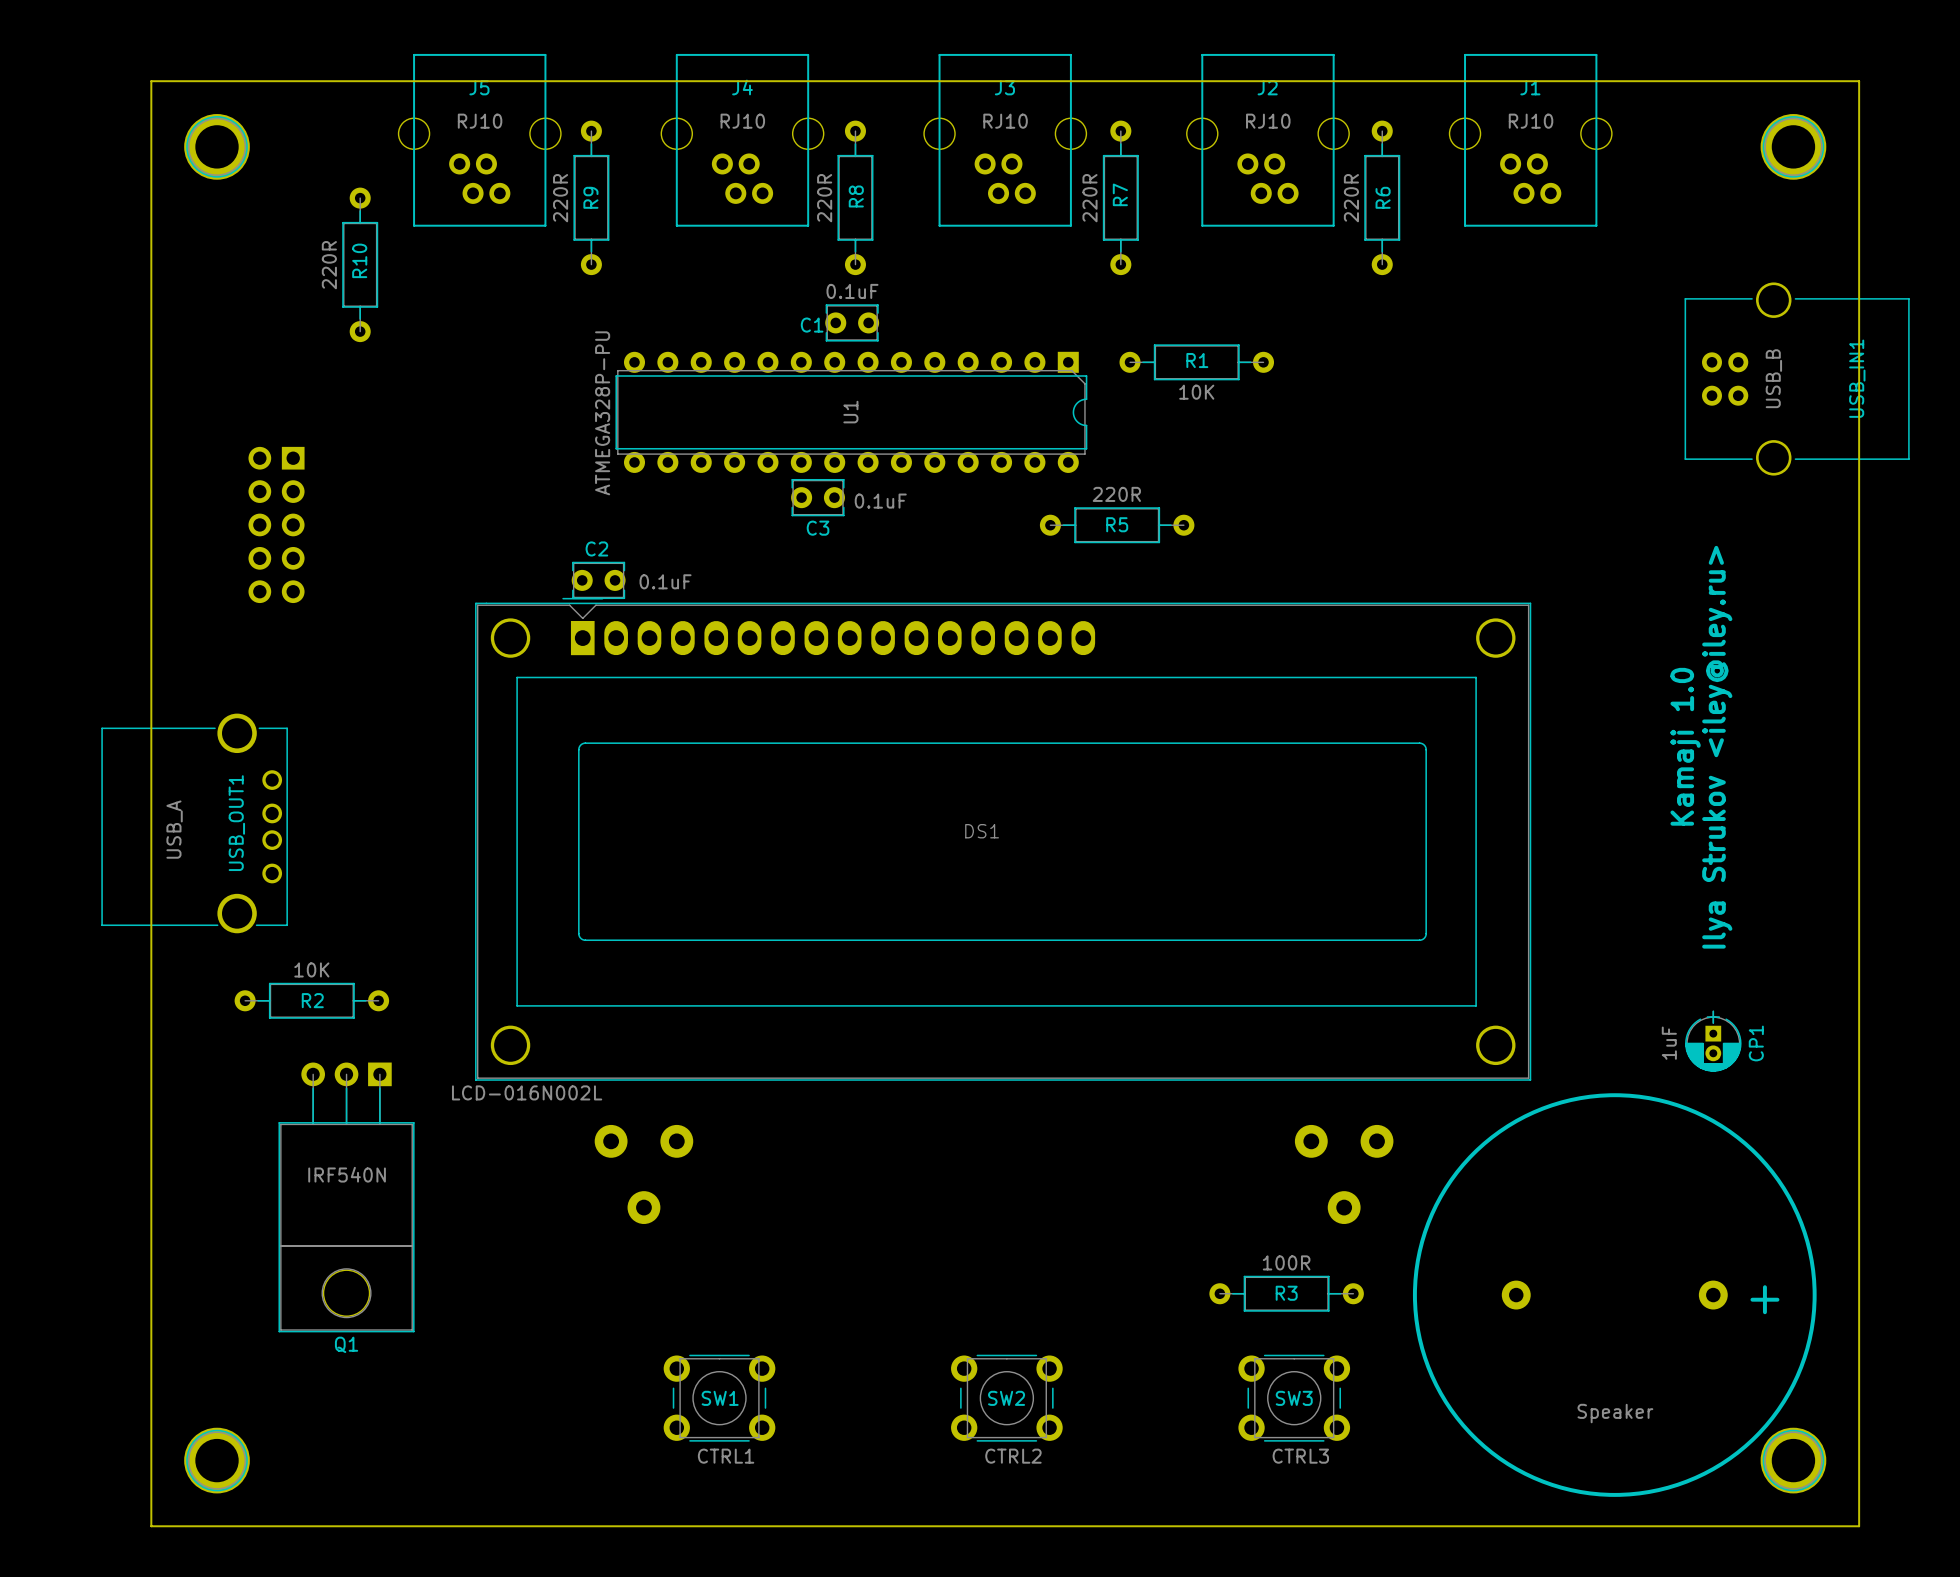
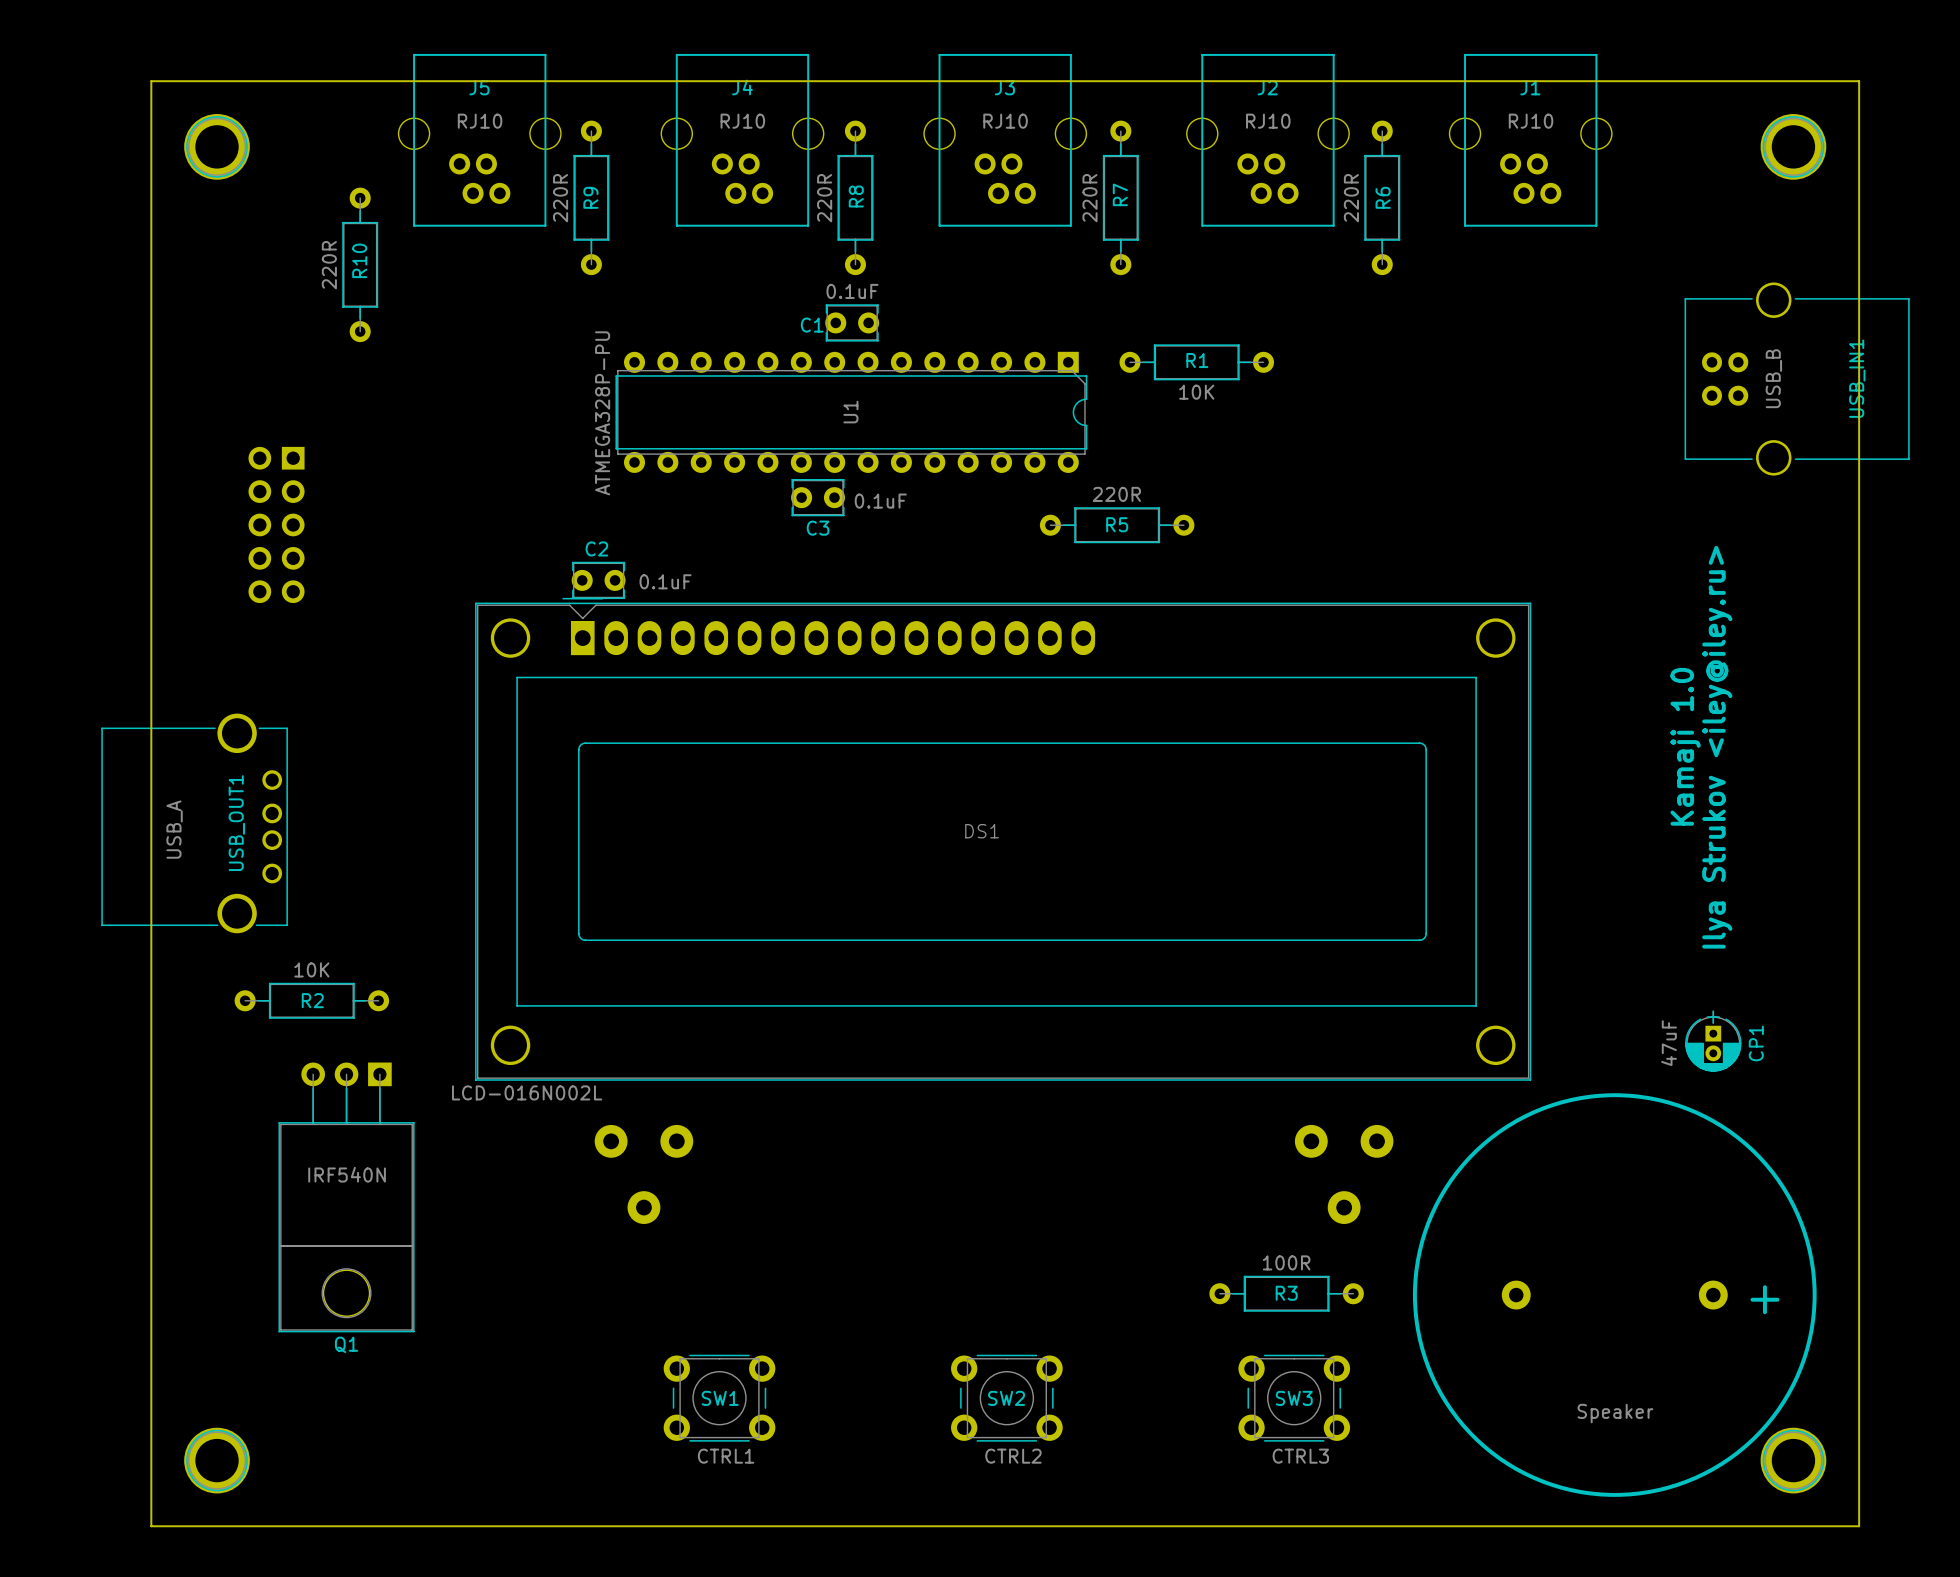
CP1 value: 1uF (1669, 1043) -> 47uF (1669, 1043)

